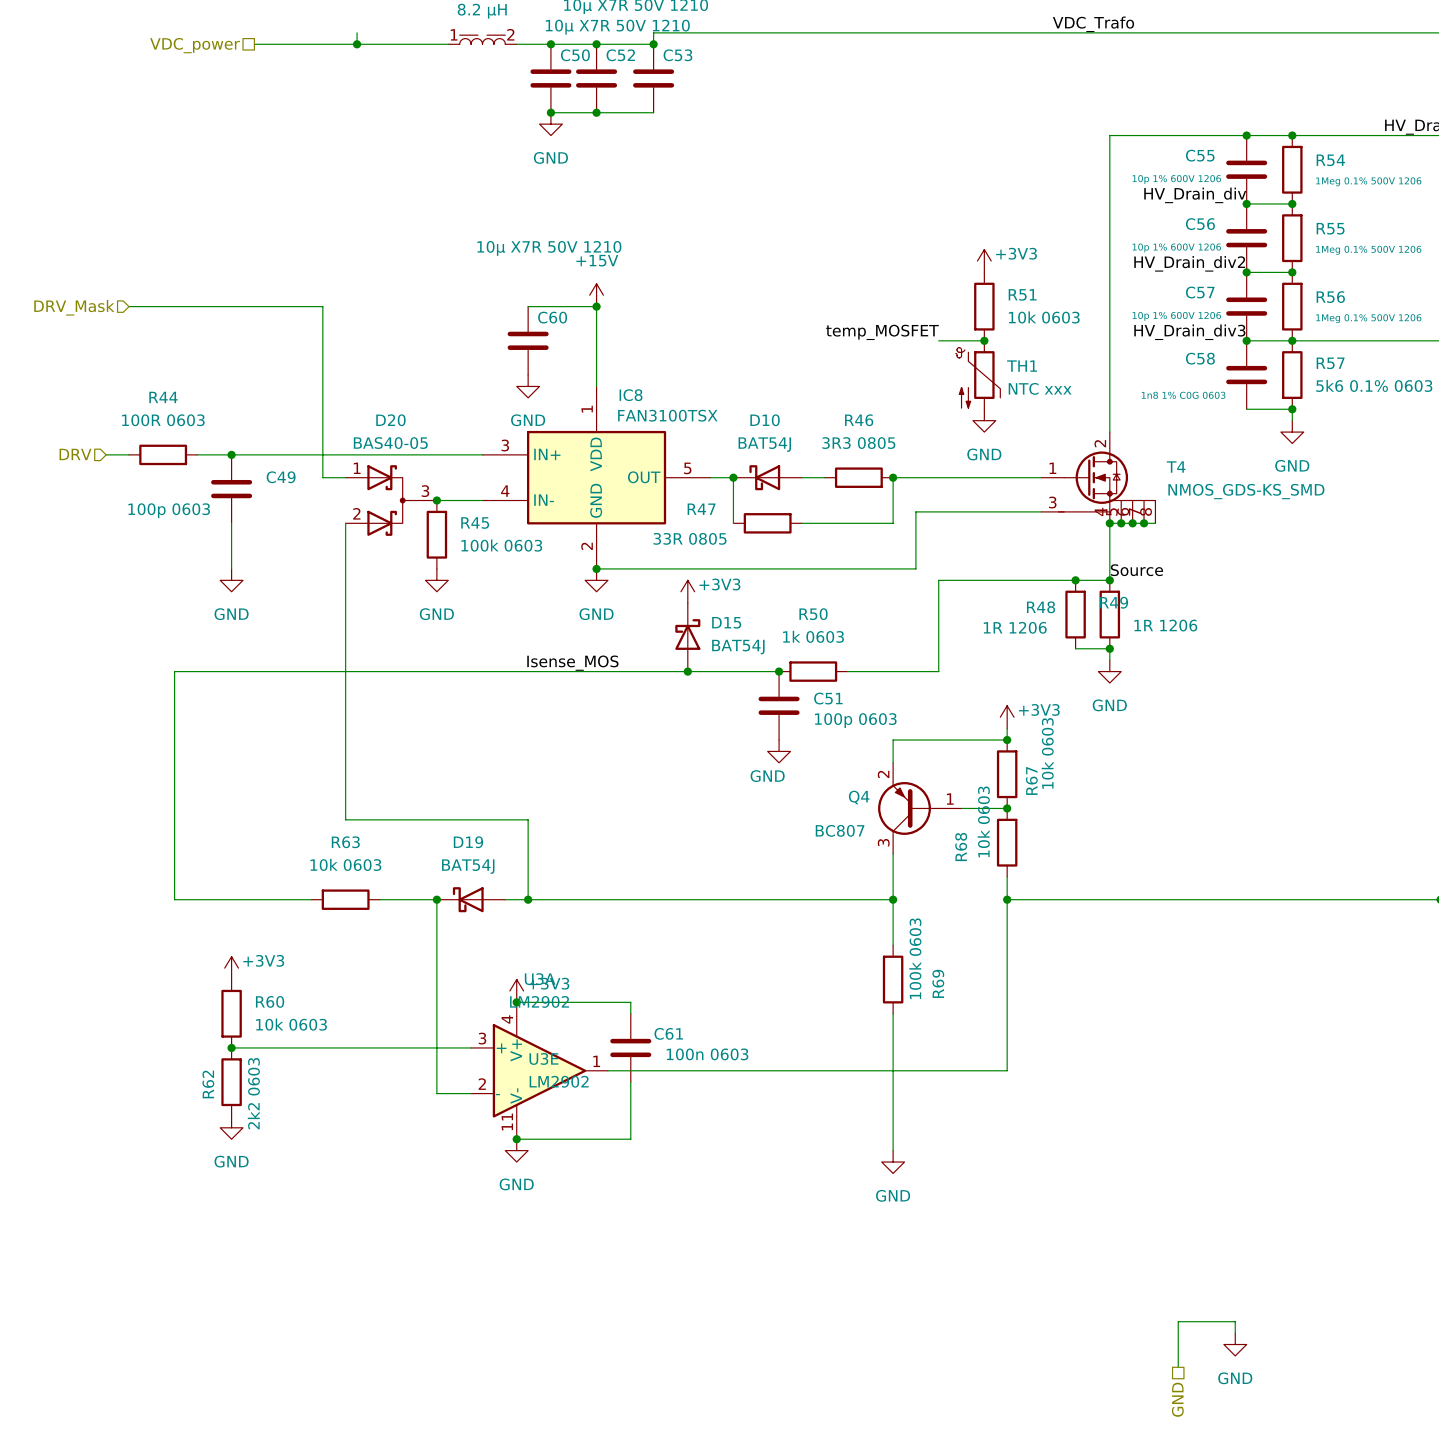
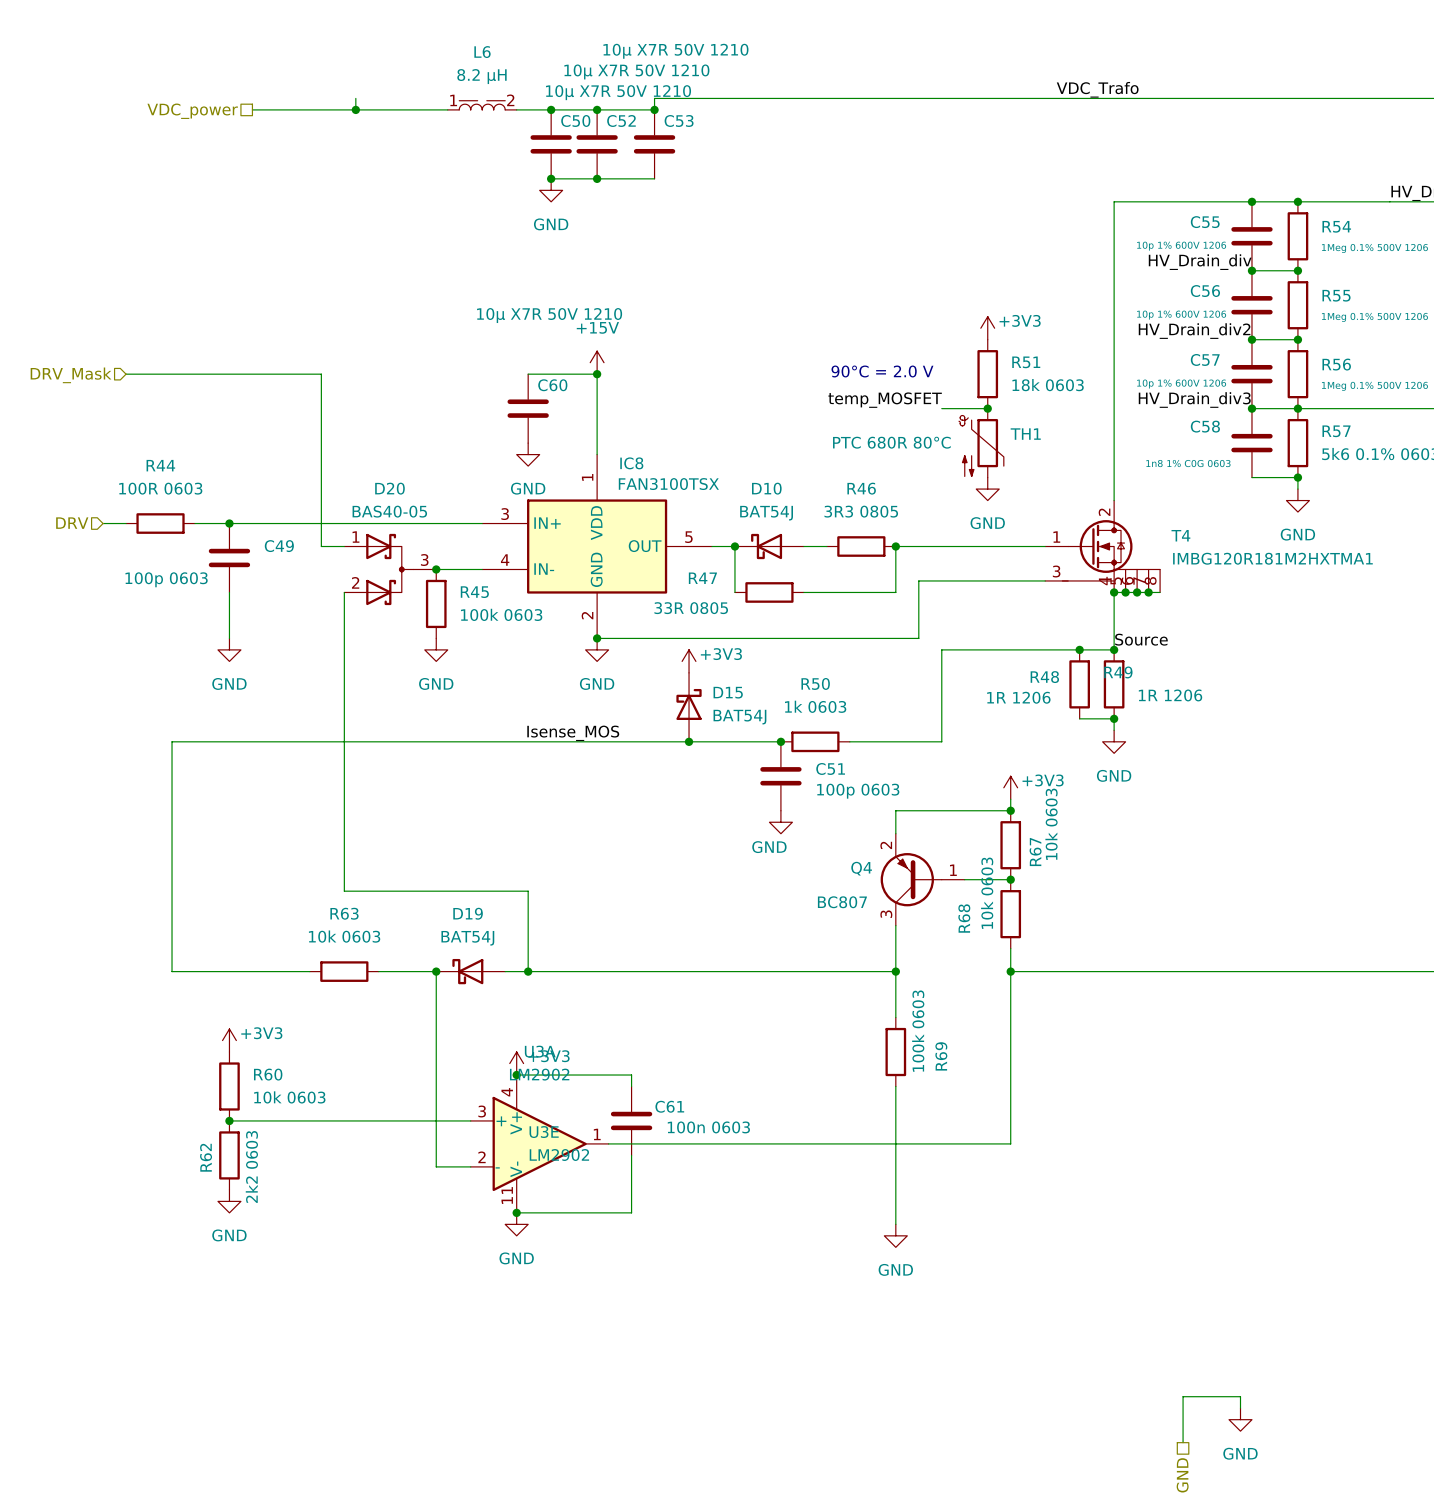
text: none -> 90°C = 2.0 V (882, 371)
R51 value: 10k 0603 (1044, 317) -> 18k 0603 (1048, 385)
TH1 value: NTC xxx (1040, 388) -> PTC 680R 80°C (891, 442)
T4 value: NMOS_GDS-KS_SMD (1246, 491) -> IMBG120R181M2HXTMA1 (1272, 558)

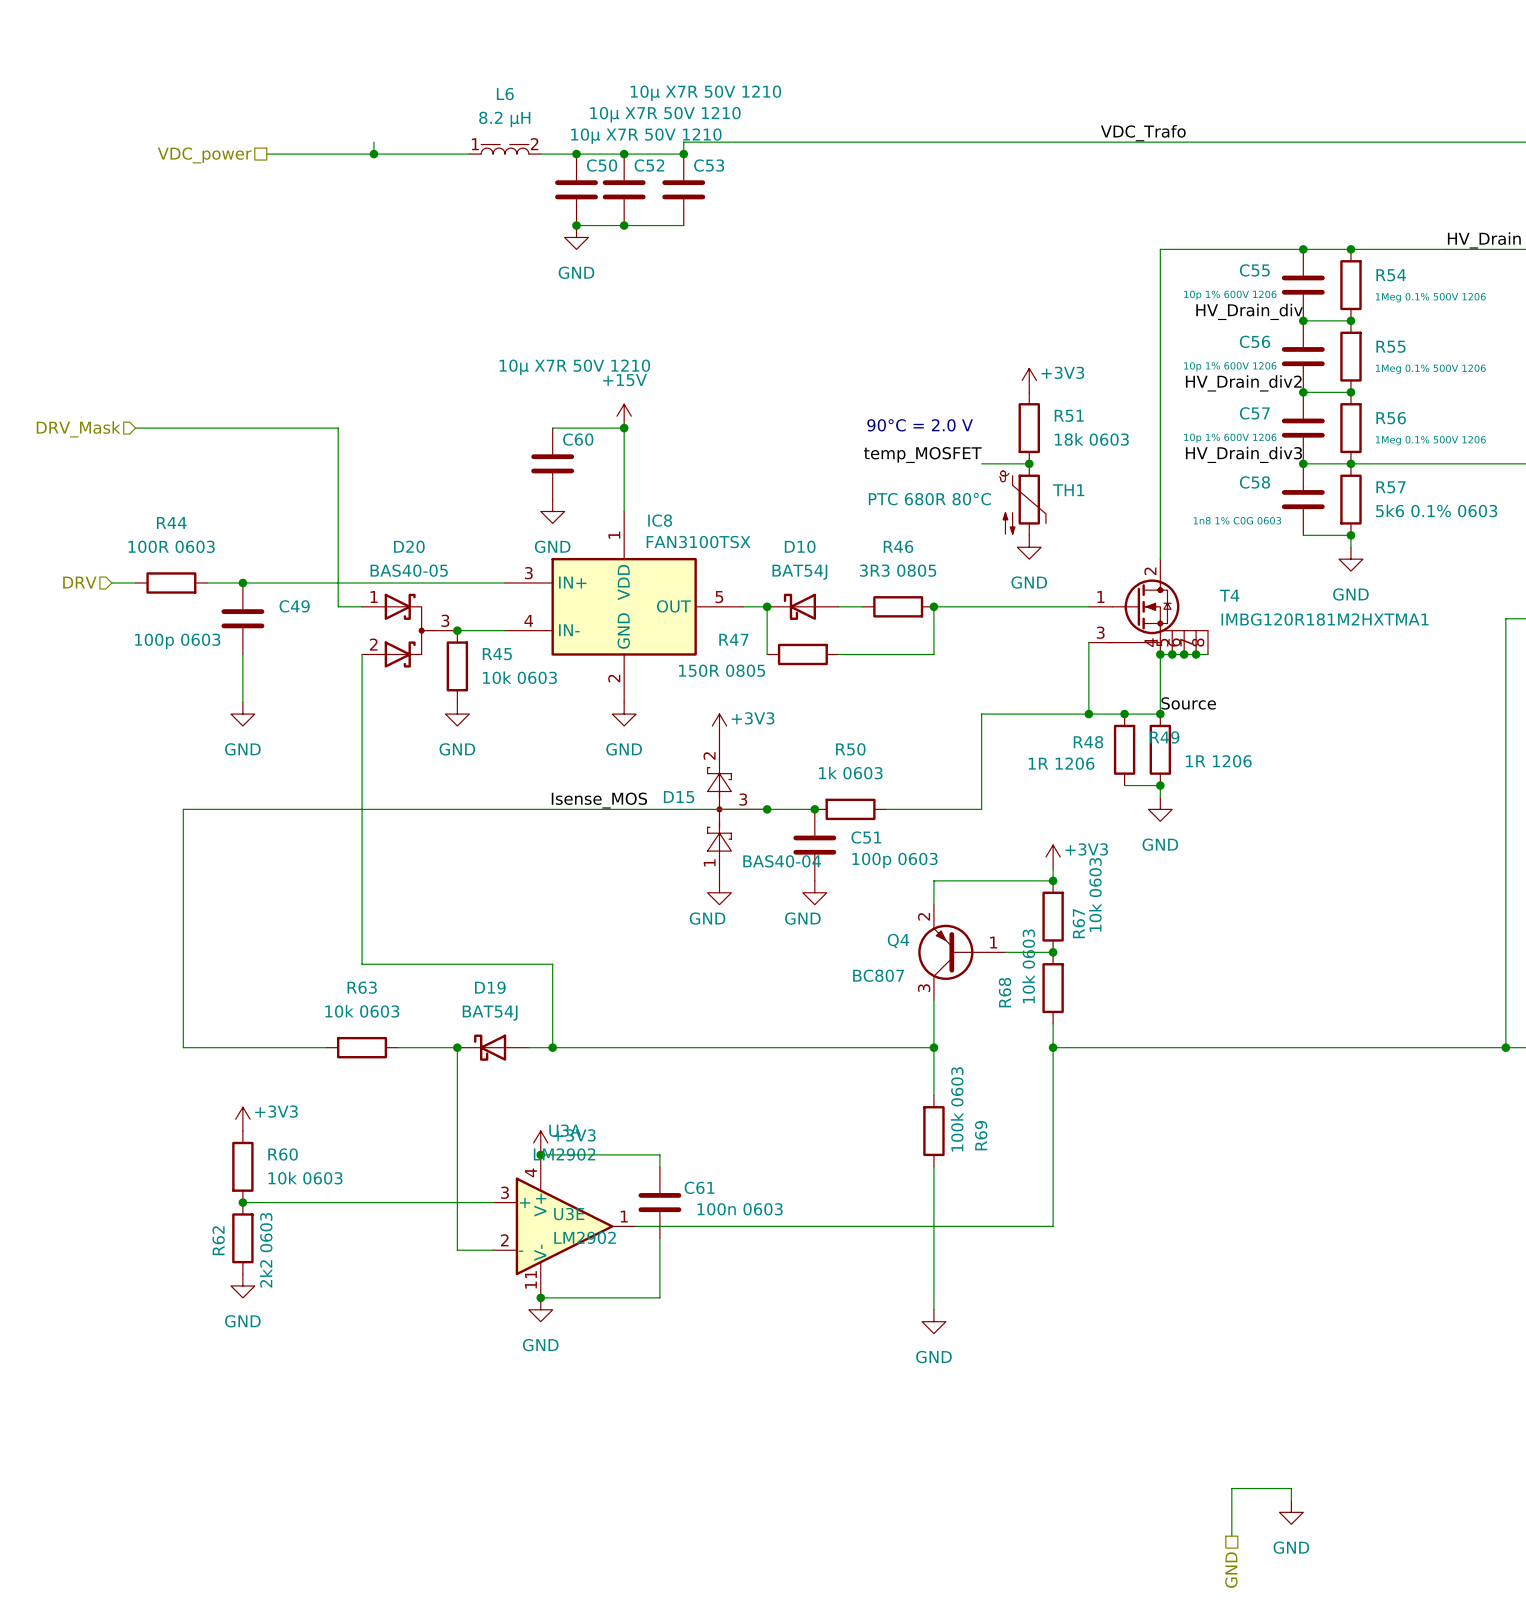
wire: (1045, 580) (918, 580) (918, 638) (597, 638) -> (1088, 642) (1088, 714)
R47 value: 33R 0805 (691, 608) -> 150R 0805 (722, 670)
R45 value: 100k 0603 (501, 614) -> 10k 0603 (519, 677)
junction: (597, 638) -> none
junction: none -> (1088, 714)
D15 symbol: [676, 672, 702, 742] -> [707, 737, 768, 881]
D15 name position: D15 (728, 692) -> D15 (679, 797)
D15 value: BAT54J (739, 717) -> BAS40-04 (782, 861)
junction position: (689, 741) -> (767, 809)
power symbol: none -> GND (719, 892)

